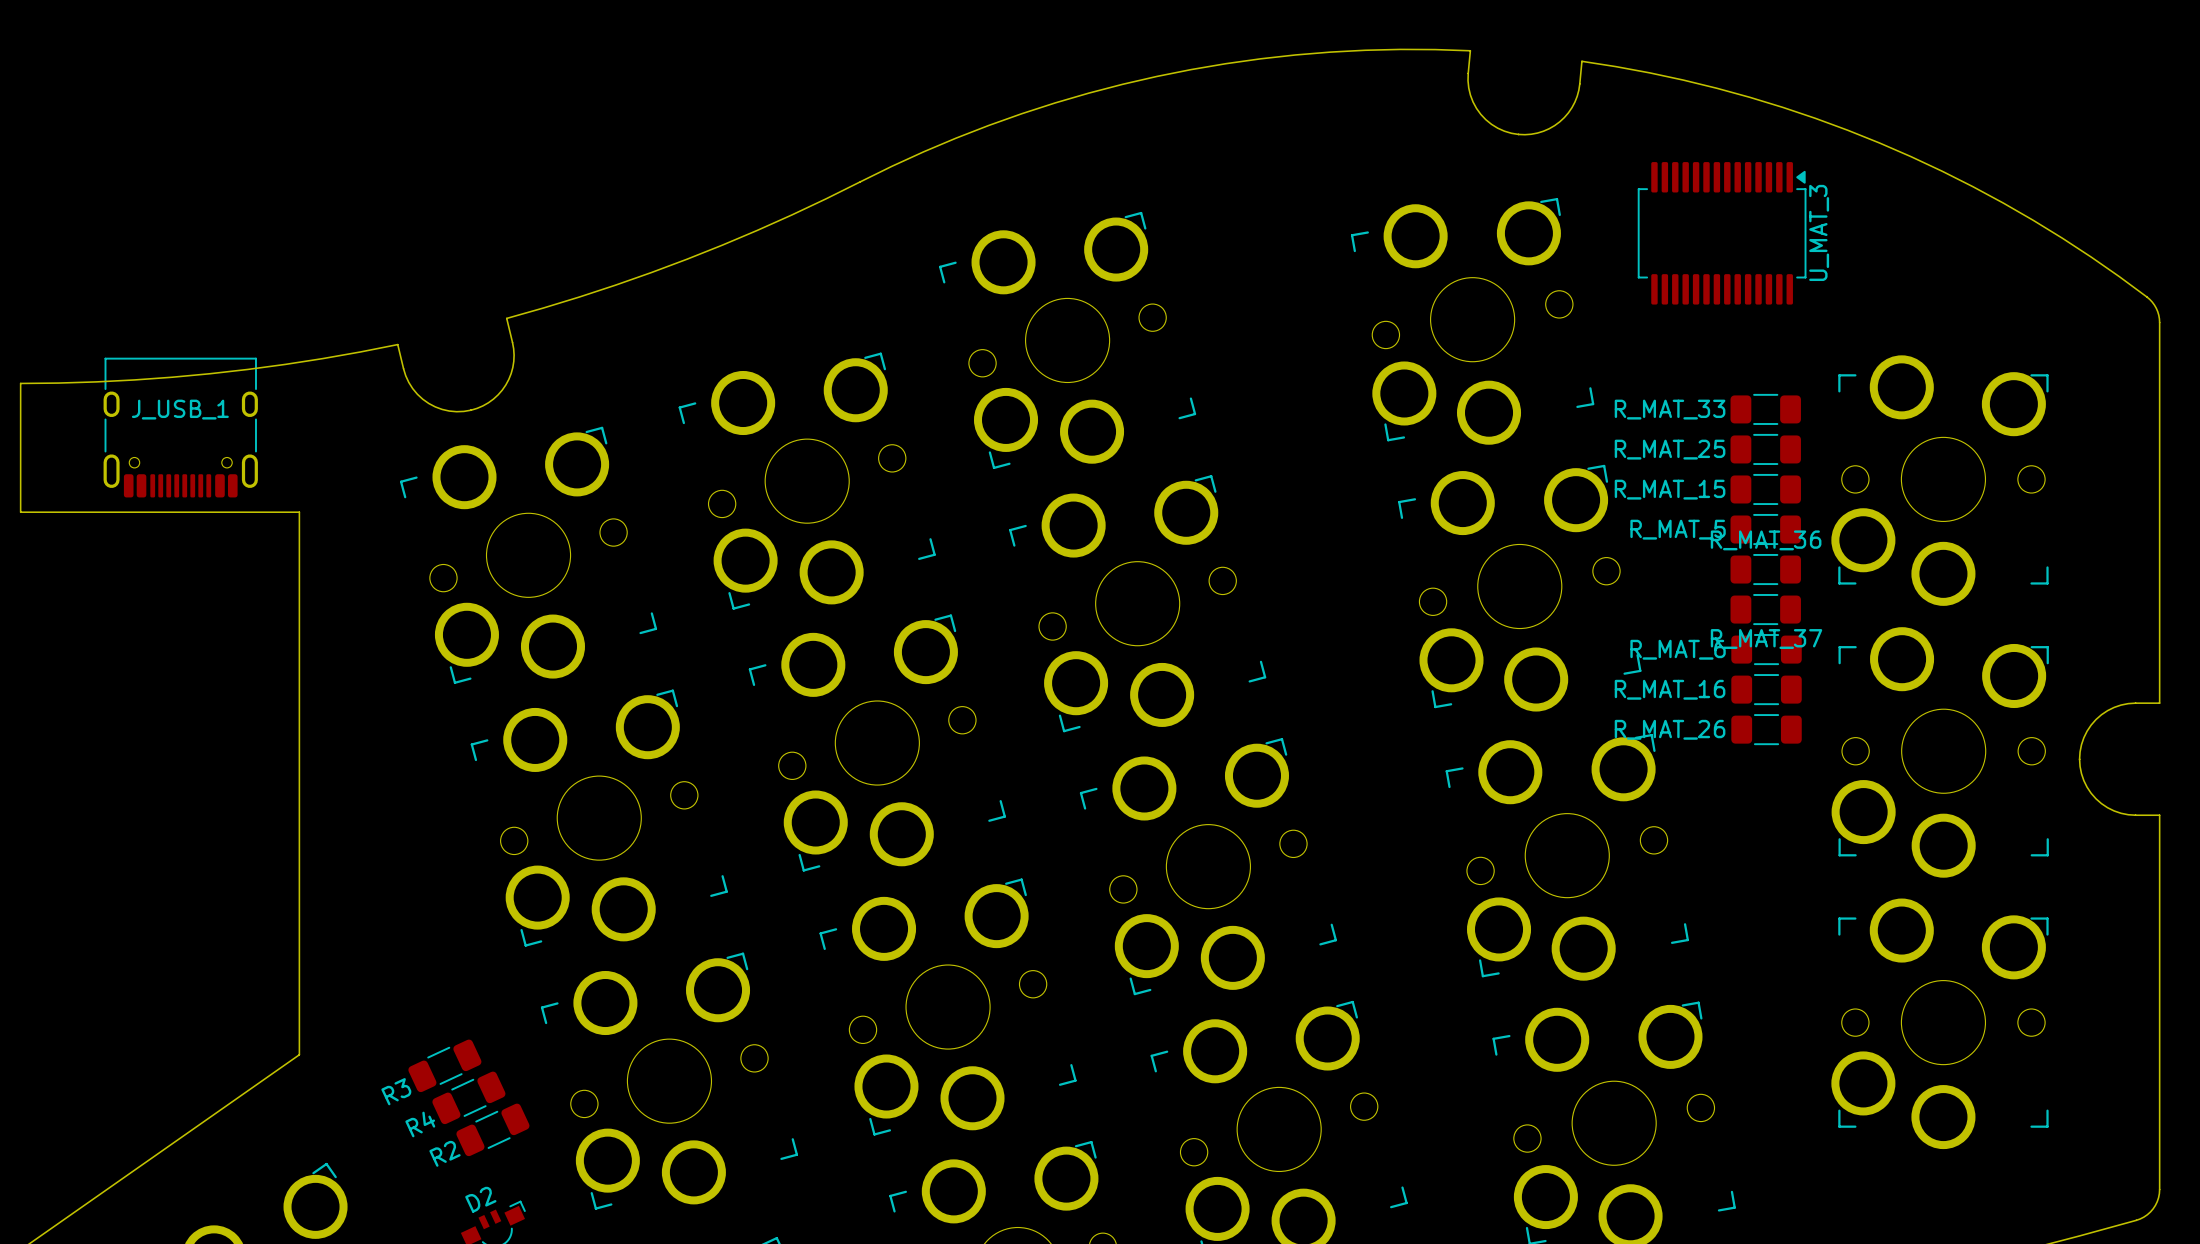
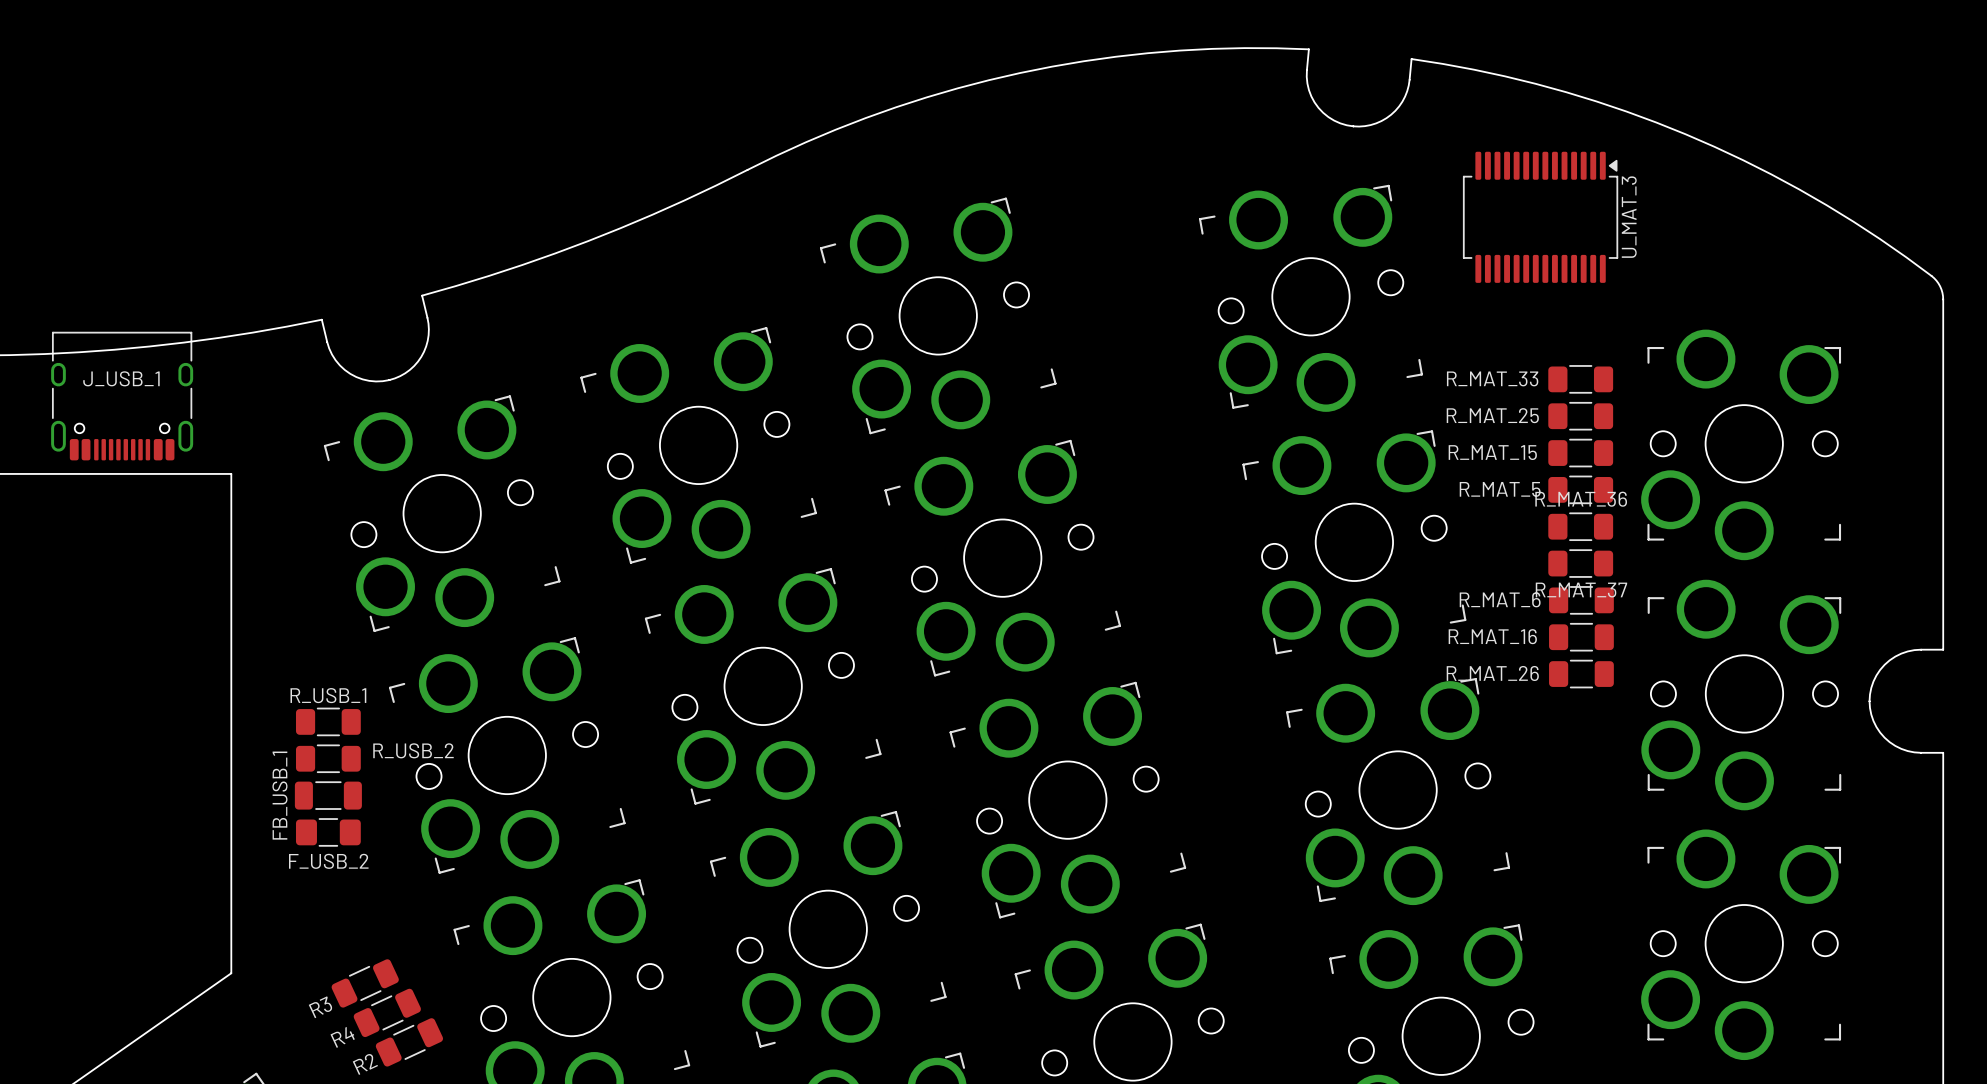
R_USB_1: none -> (328, 721)
R_USB_2: none -> (328, 758)
FB_USB_1: none -> (328, 795)
F_USB_2: none -> (328, 832)

